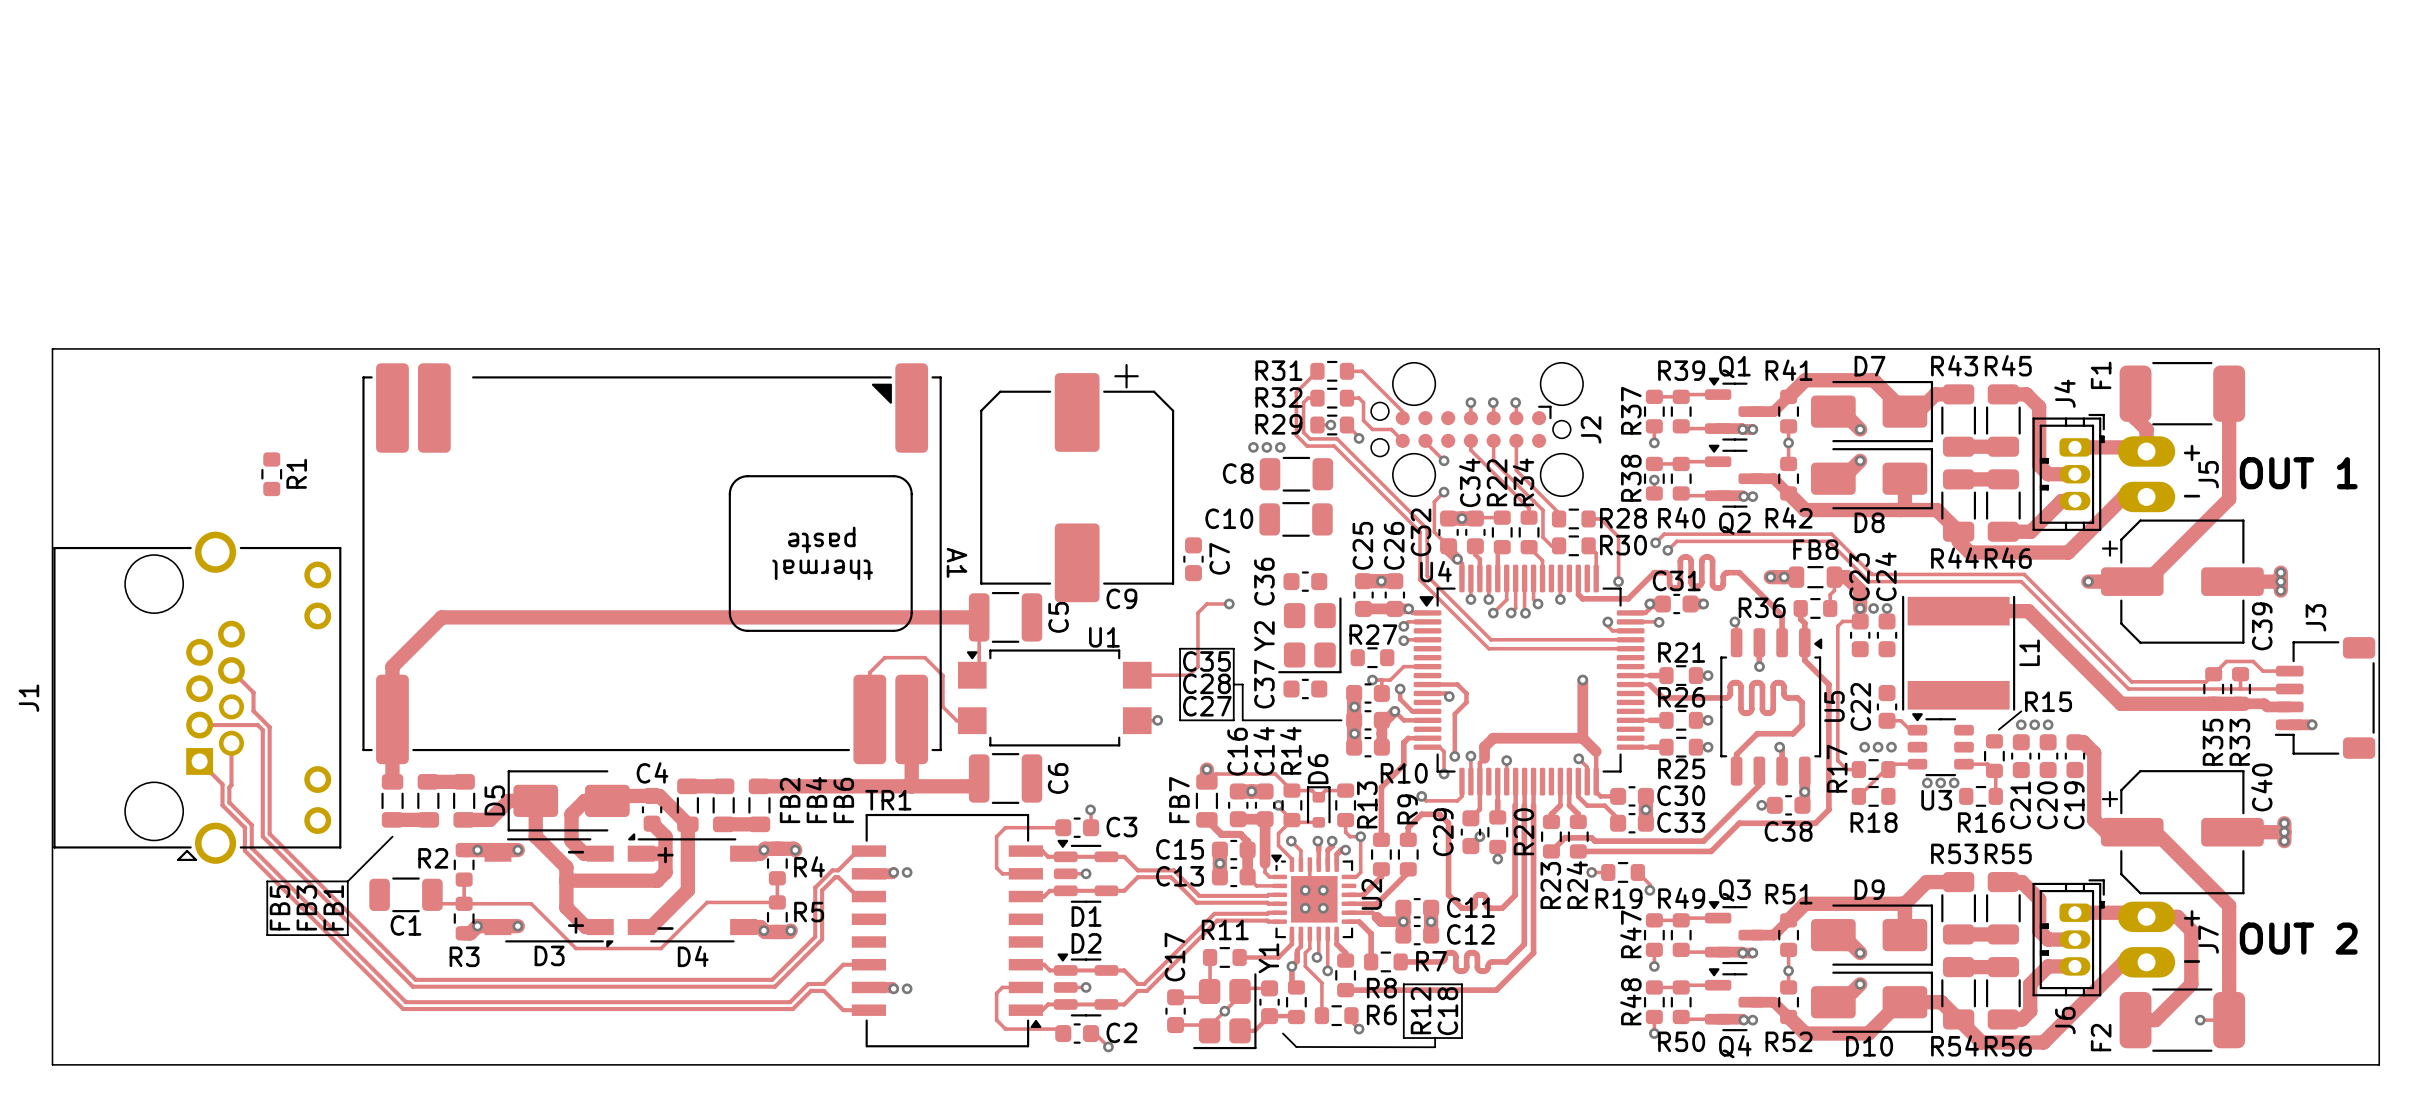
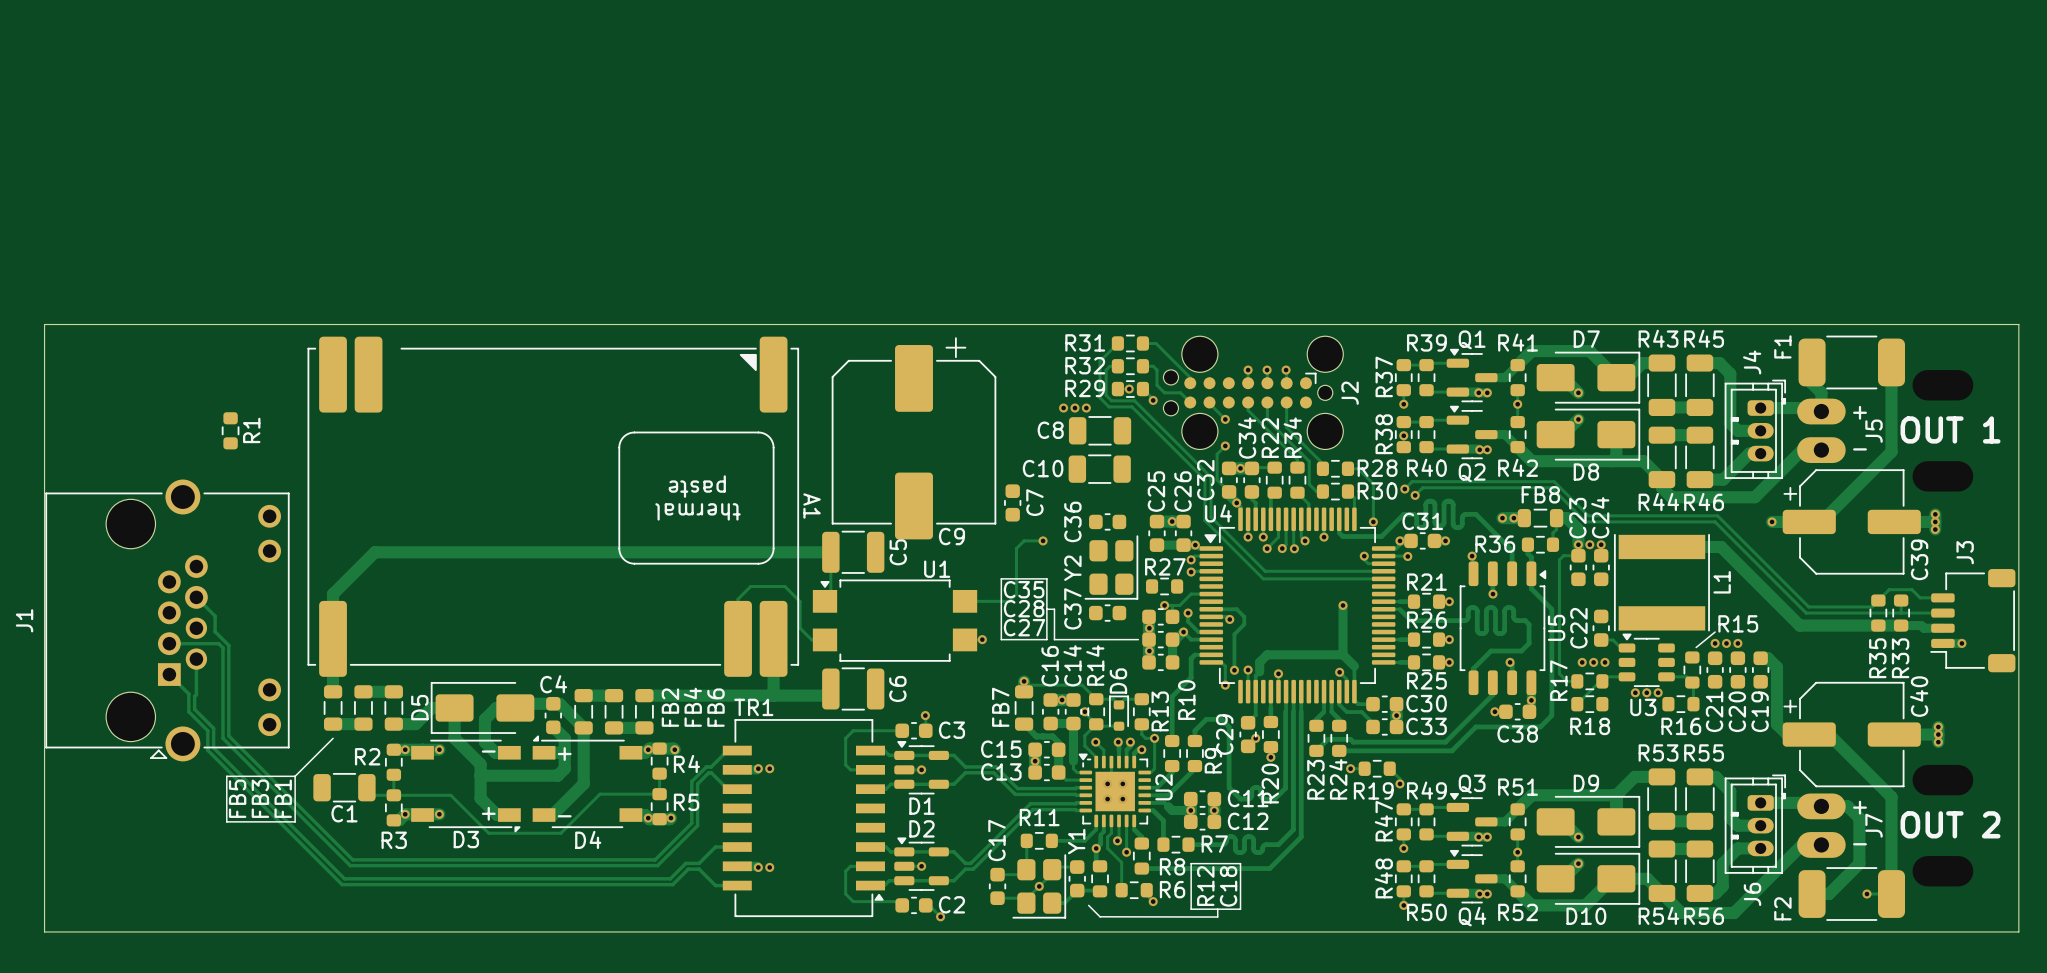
R10 name rotation: 0° (1404, 773) -> 90° counterclockwise (1186, 700)
track: (1461, 781) (1461, 796) (1457, 800) (1426, 800) (1421, 796) -> none
via: (1421, 796) -> none
R9 name position: R9 (1407, 809) -> R9 (1213, 760)
R20 name position: R20 (1523, 831) -> R20 (1270, 783)

